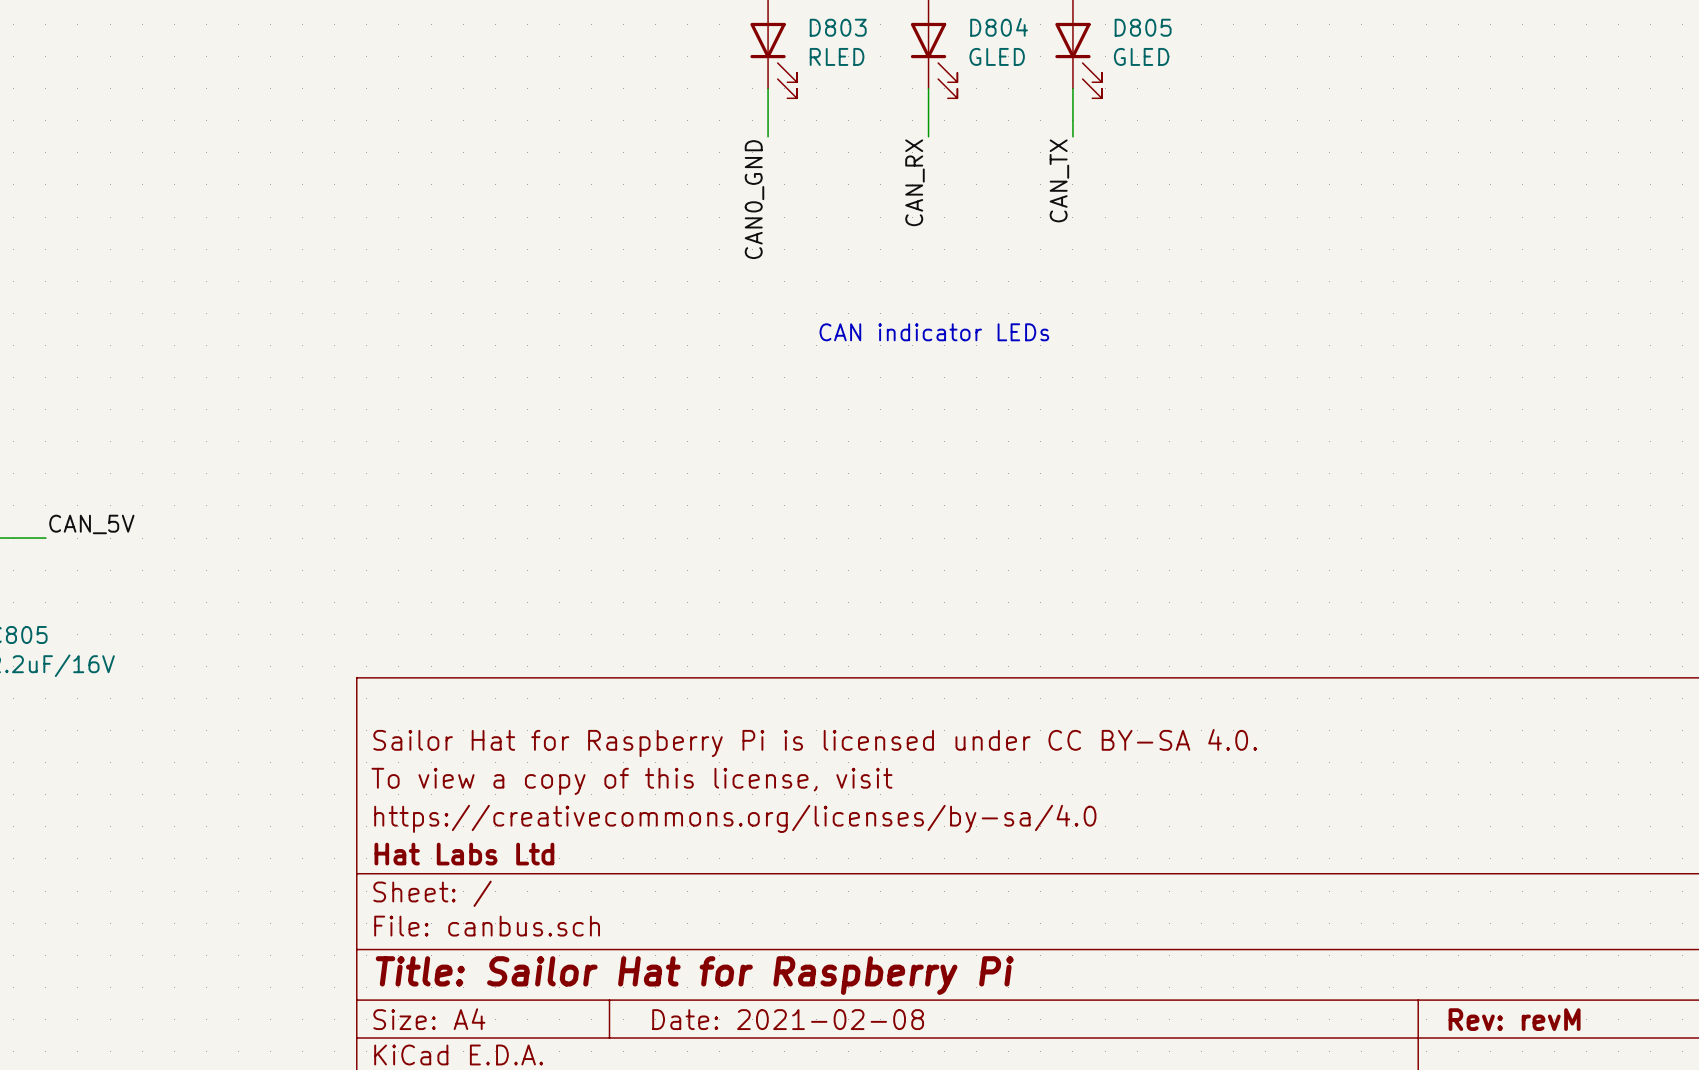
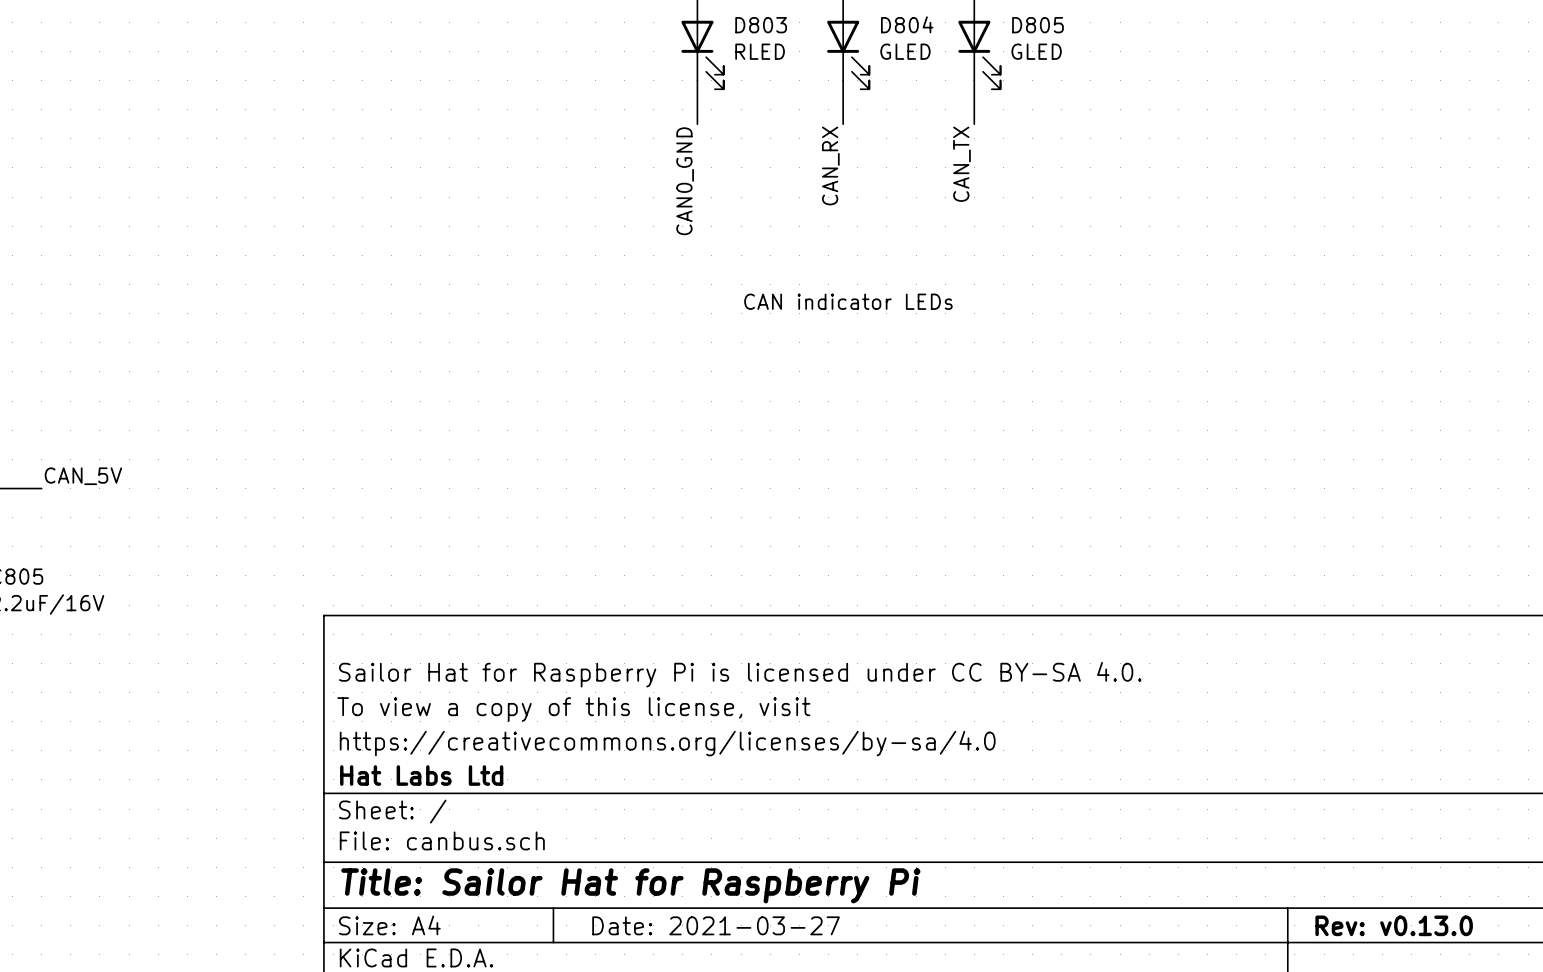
title block: Date: 2021-02-08 (788, 1019) -> Date: 2021-03-27 (716, 925)
title block: Rev: revM (1514, 1019) -> Rev: v0.13.0 (1394, 925)

